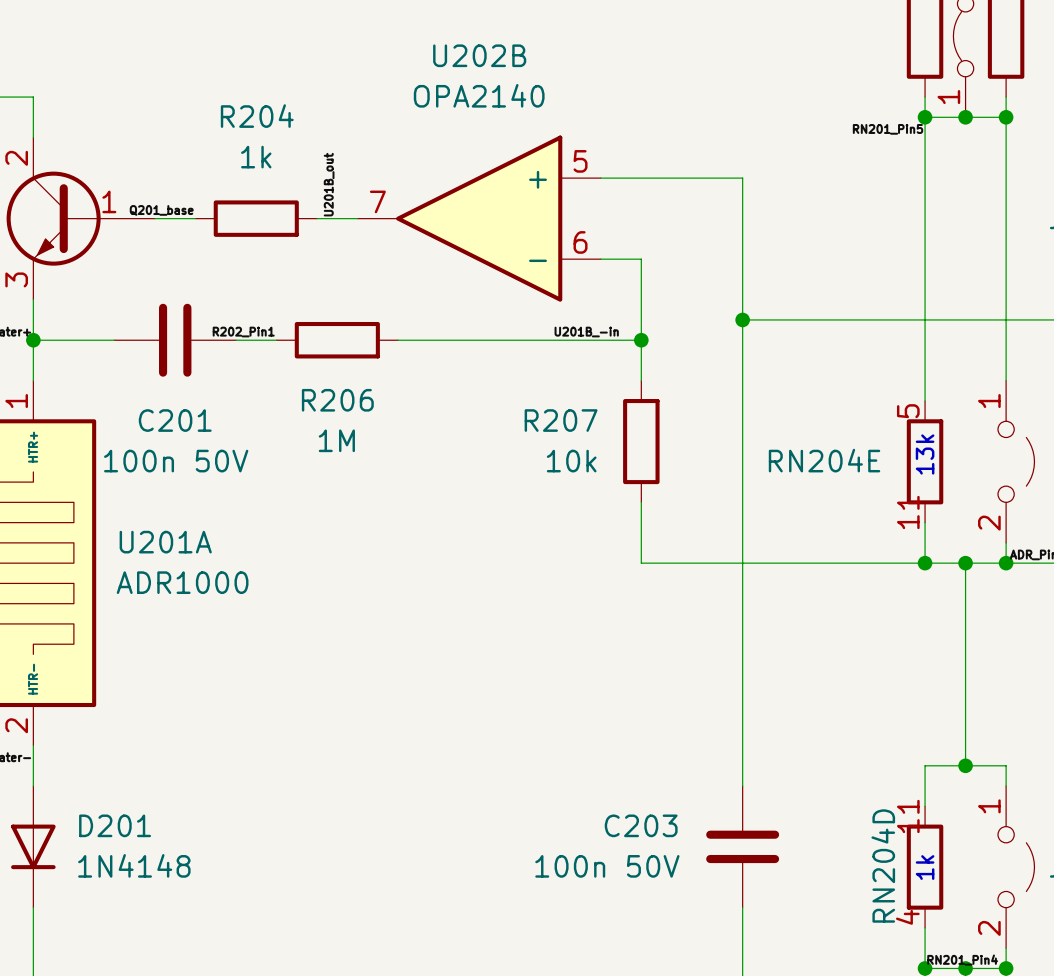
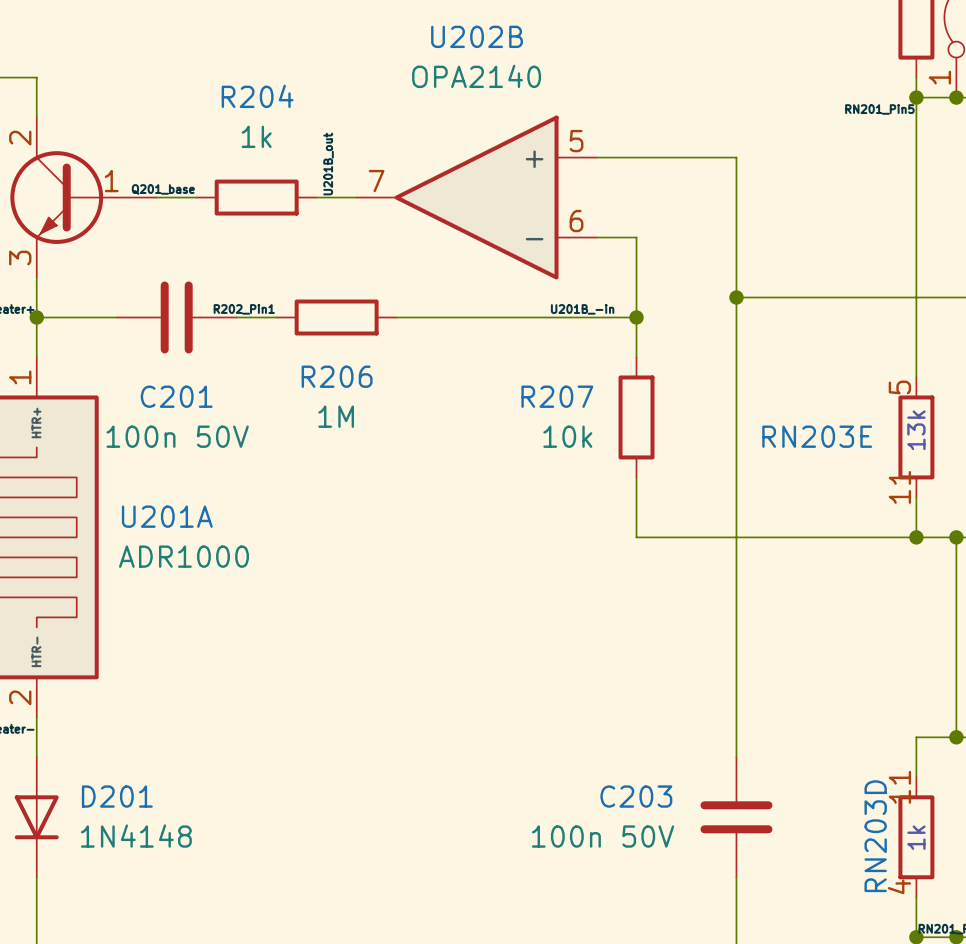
RN204E name: RN204E (824, 460) -> RN203E (817, 436)
RN204D name: RN204D (883, 866) -> RN203D (875, 836)

